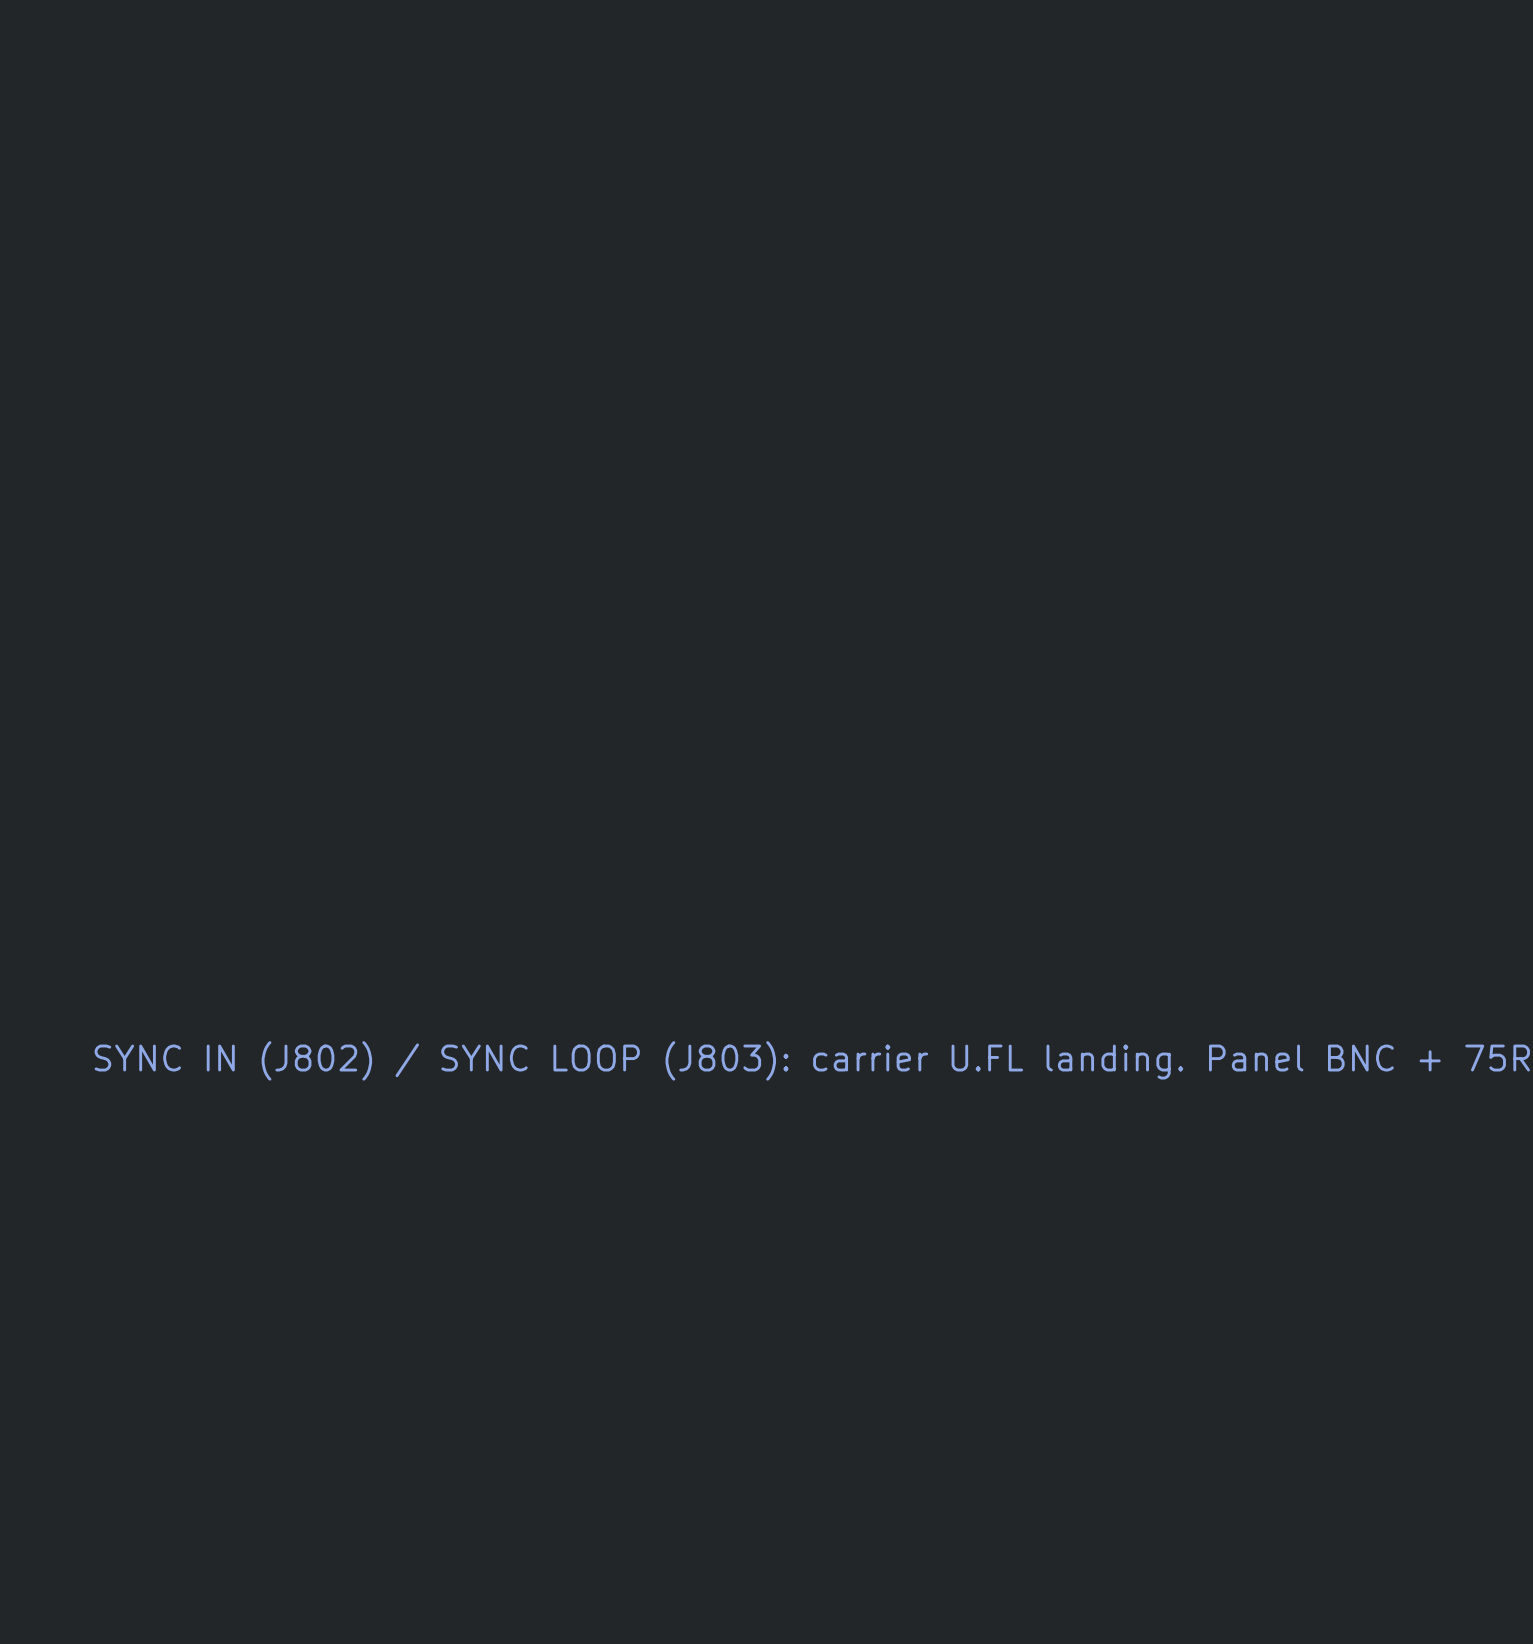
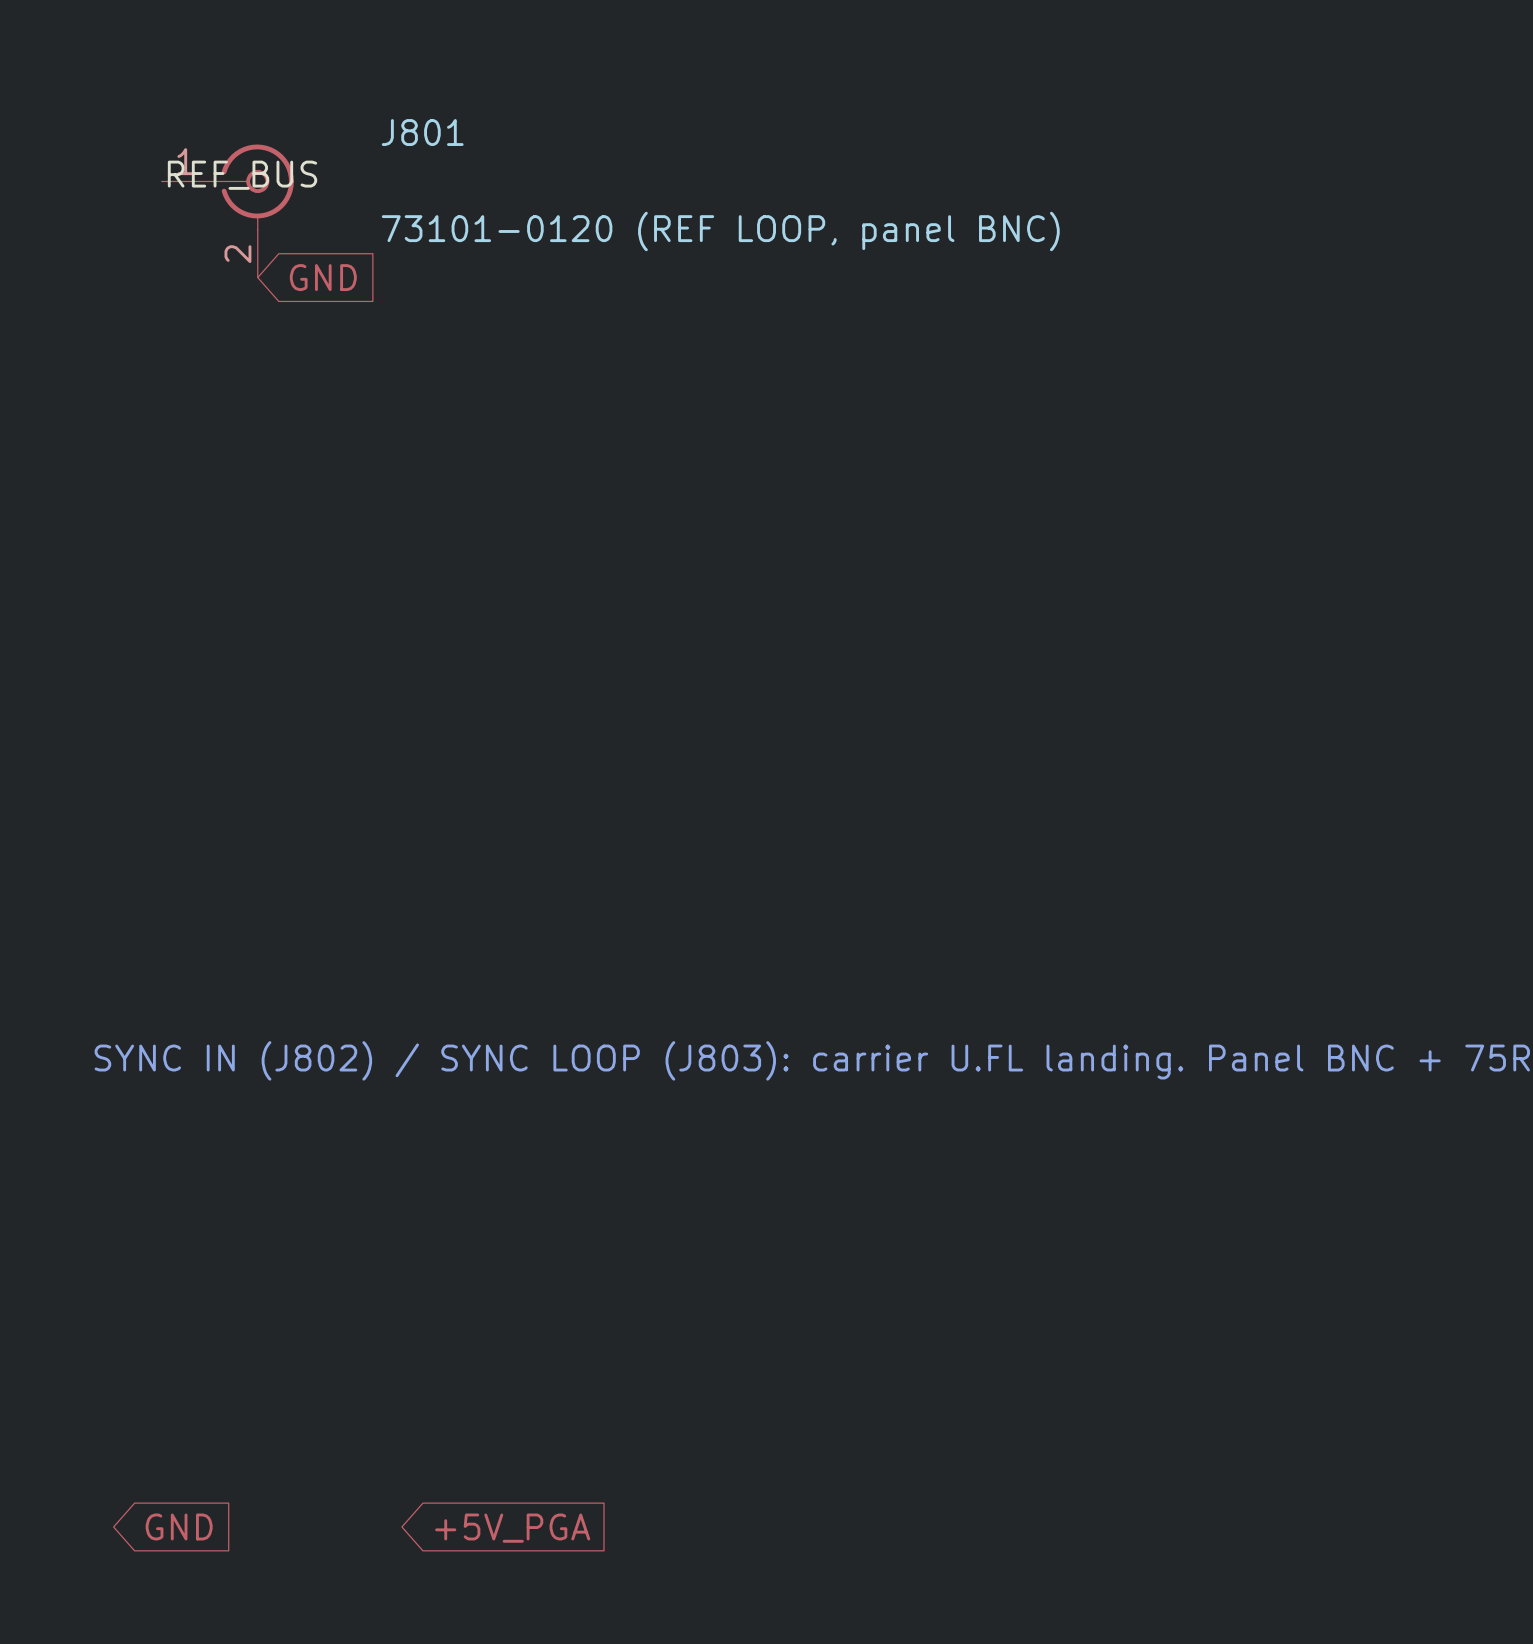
label: none -> REF_BUS (242, 175)
J801: none -> 73101-0120 (REF LOOP, panel BNC) (227, 211)
global label: none -> GND (323, 277)
global label: none -> GND (179, 1526)
global label: none -> +5V_PGA (512, 1528)

